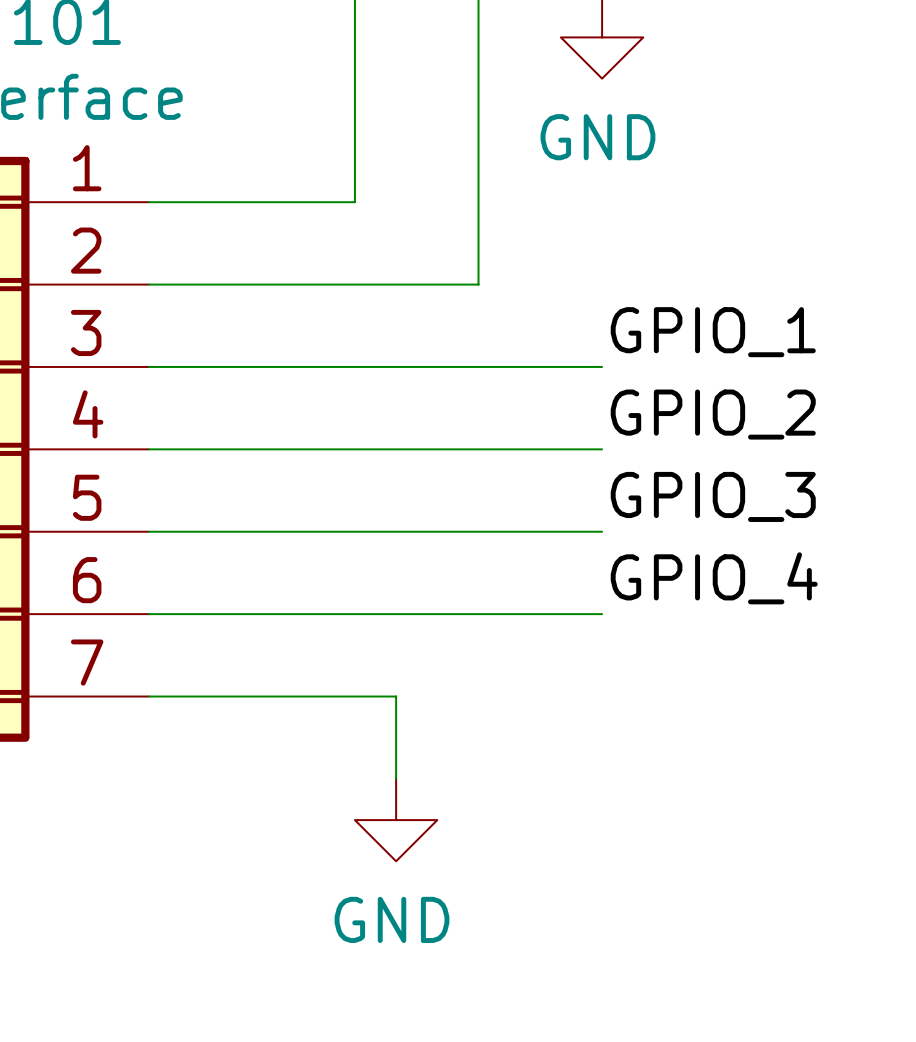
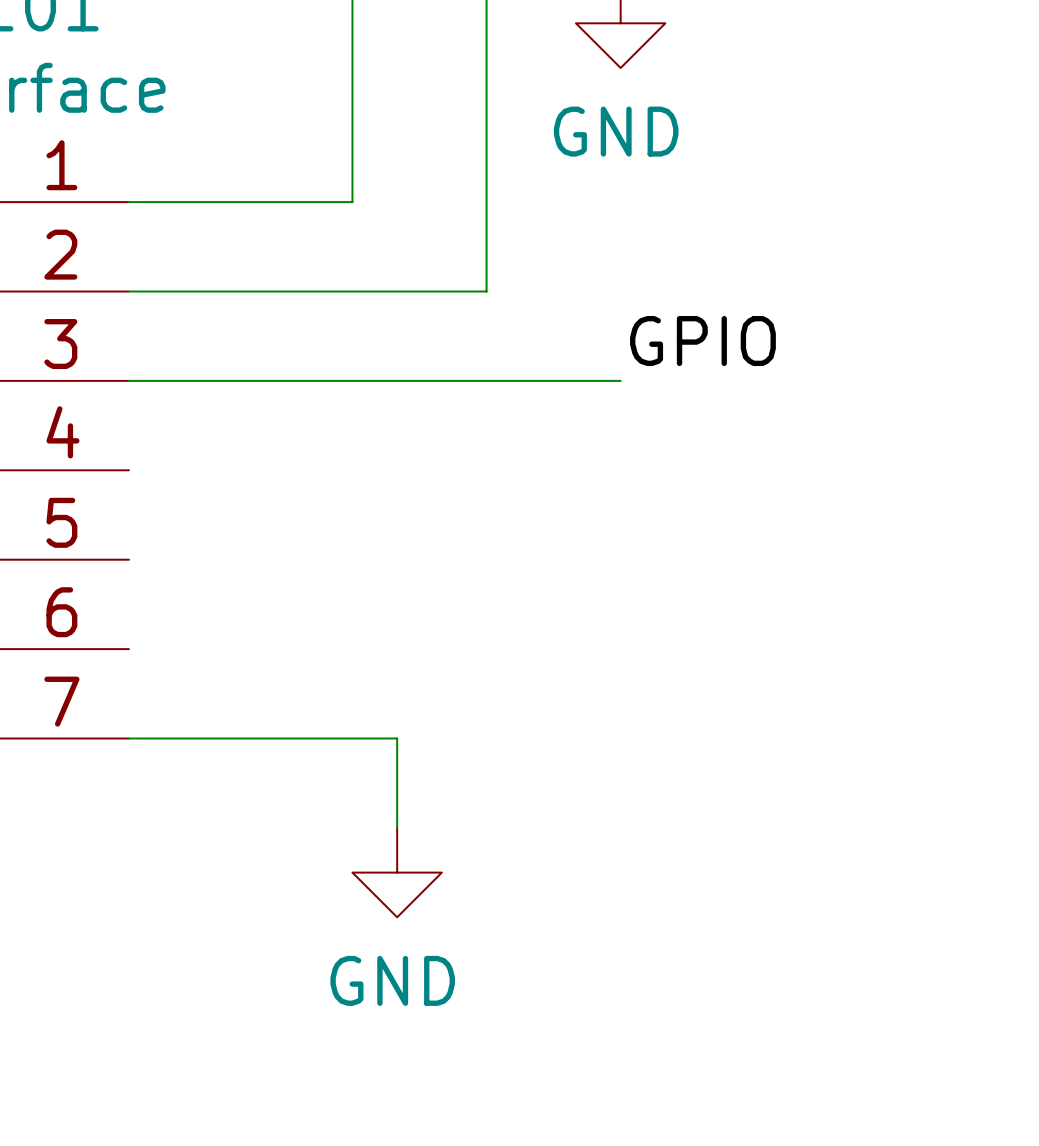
label: GPIO_1 (713, 332) -> GPIO (702, 341)
label: GPIO_2 (713, 414) -> none
wire: (148, 449) (602, 449) -> none
label: GPIO_3 (713, 496) -> none
wire: (148, 531) (602, 531) -> none
label: GPIO_4 (714, 578) -> none
wire: (148, 614) (602, 614) -> none

